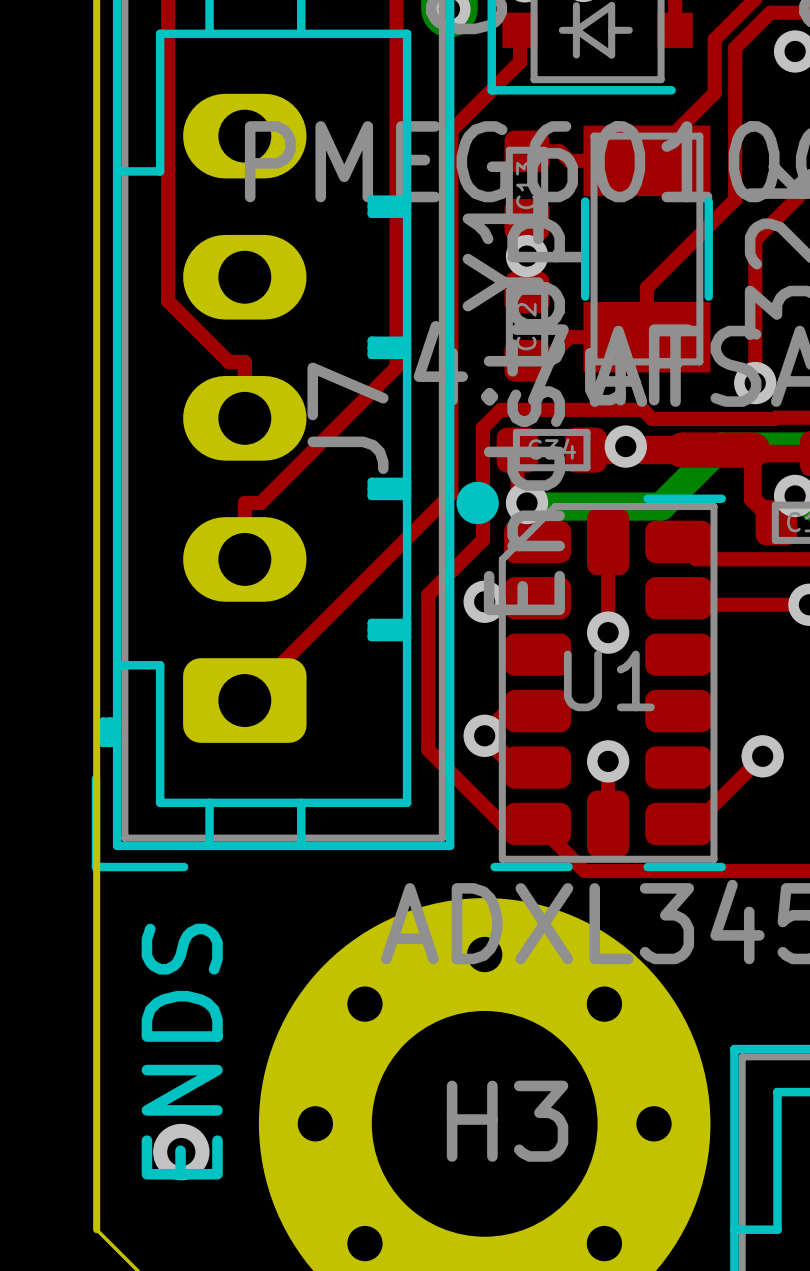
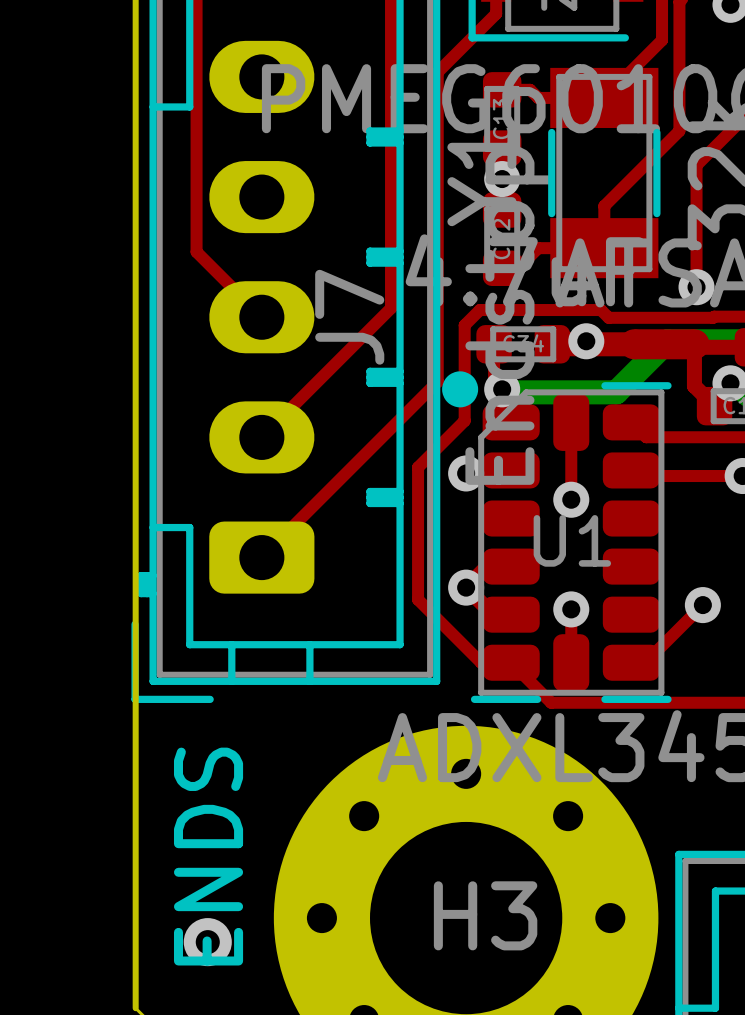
top track: (168, 301) (228, 361) (244, 361) (244, 418) -> (196, 217) (196, 251) (261, 317)
top track: (396, 367) (260, 503) (244, 503) (244, 559) -> (391, 273) (391, 308) (261, 437)

